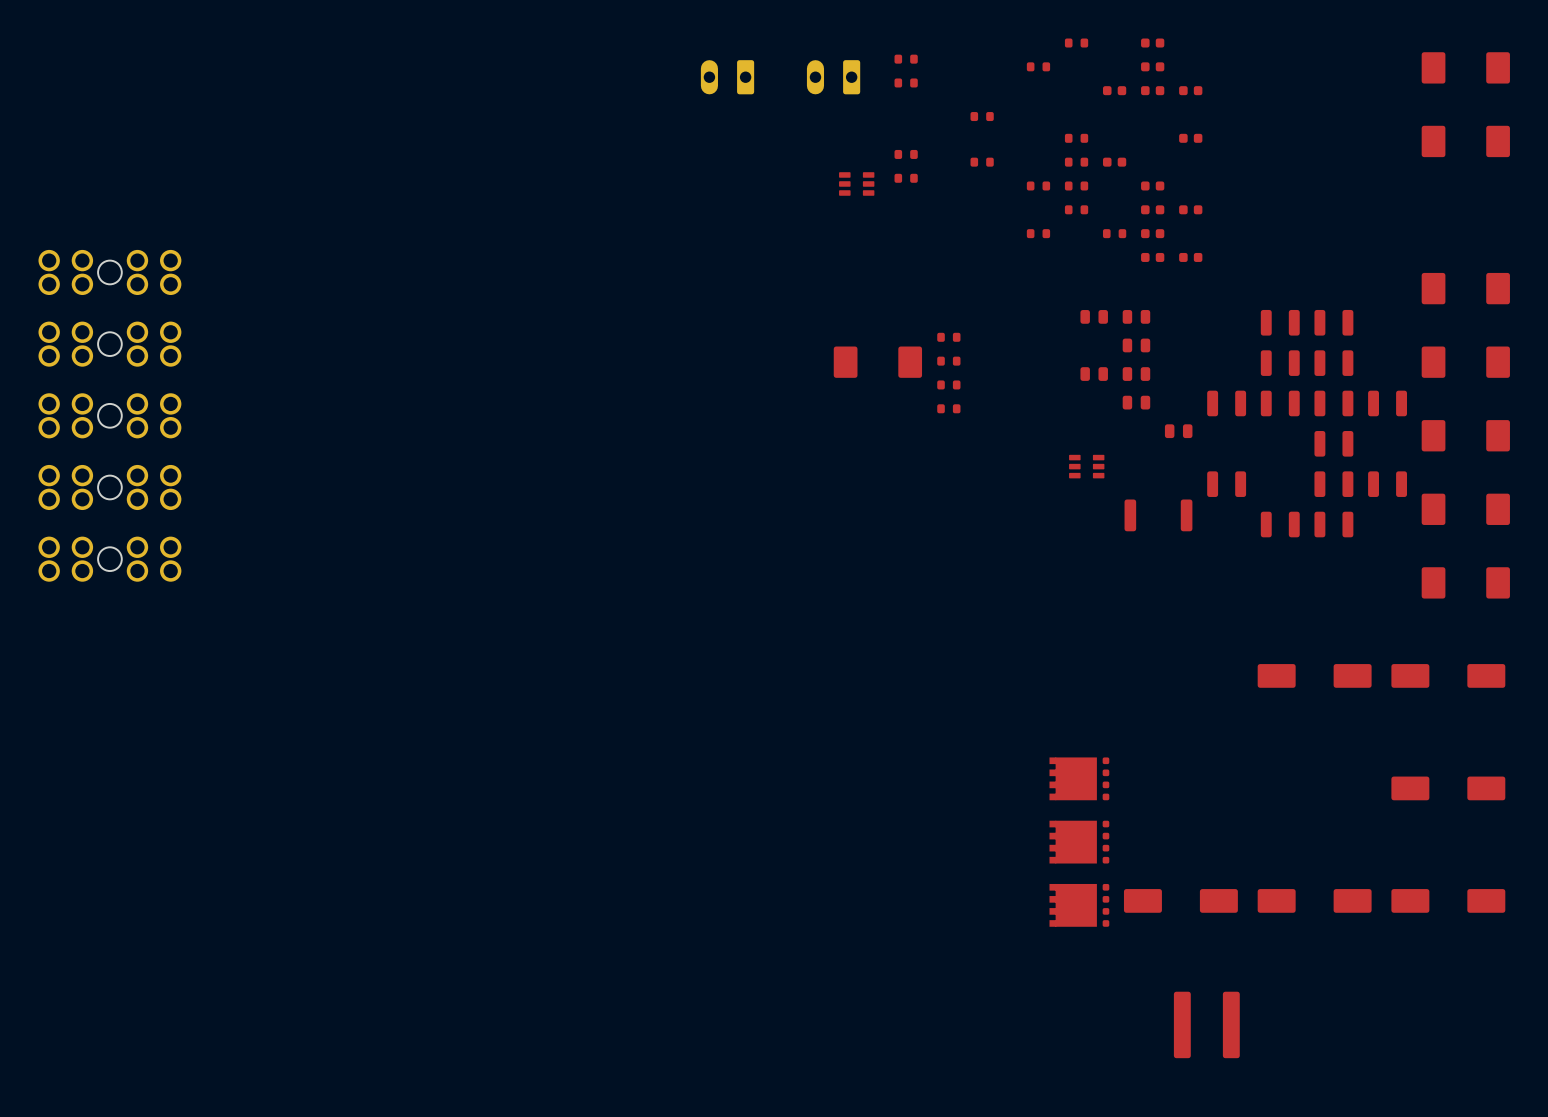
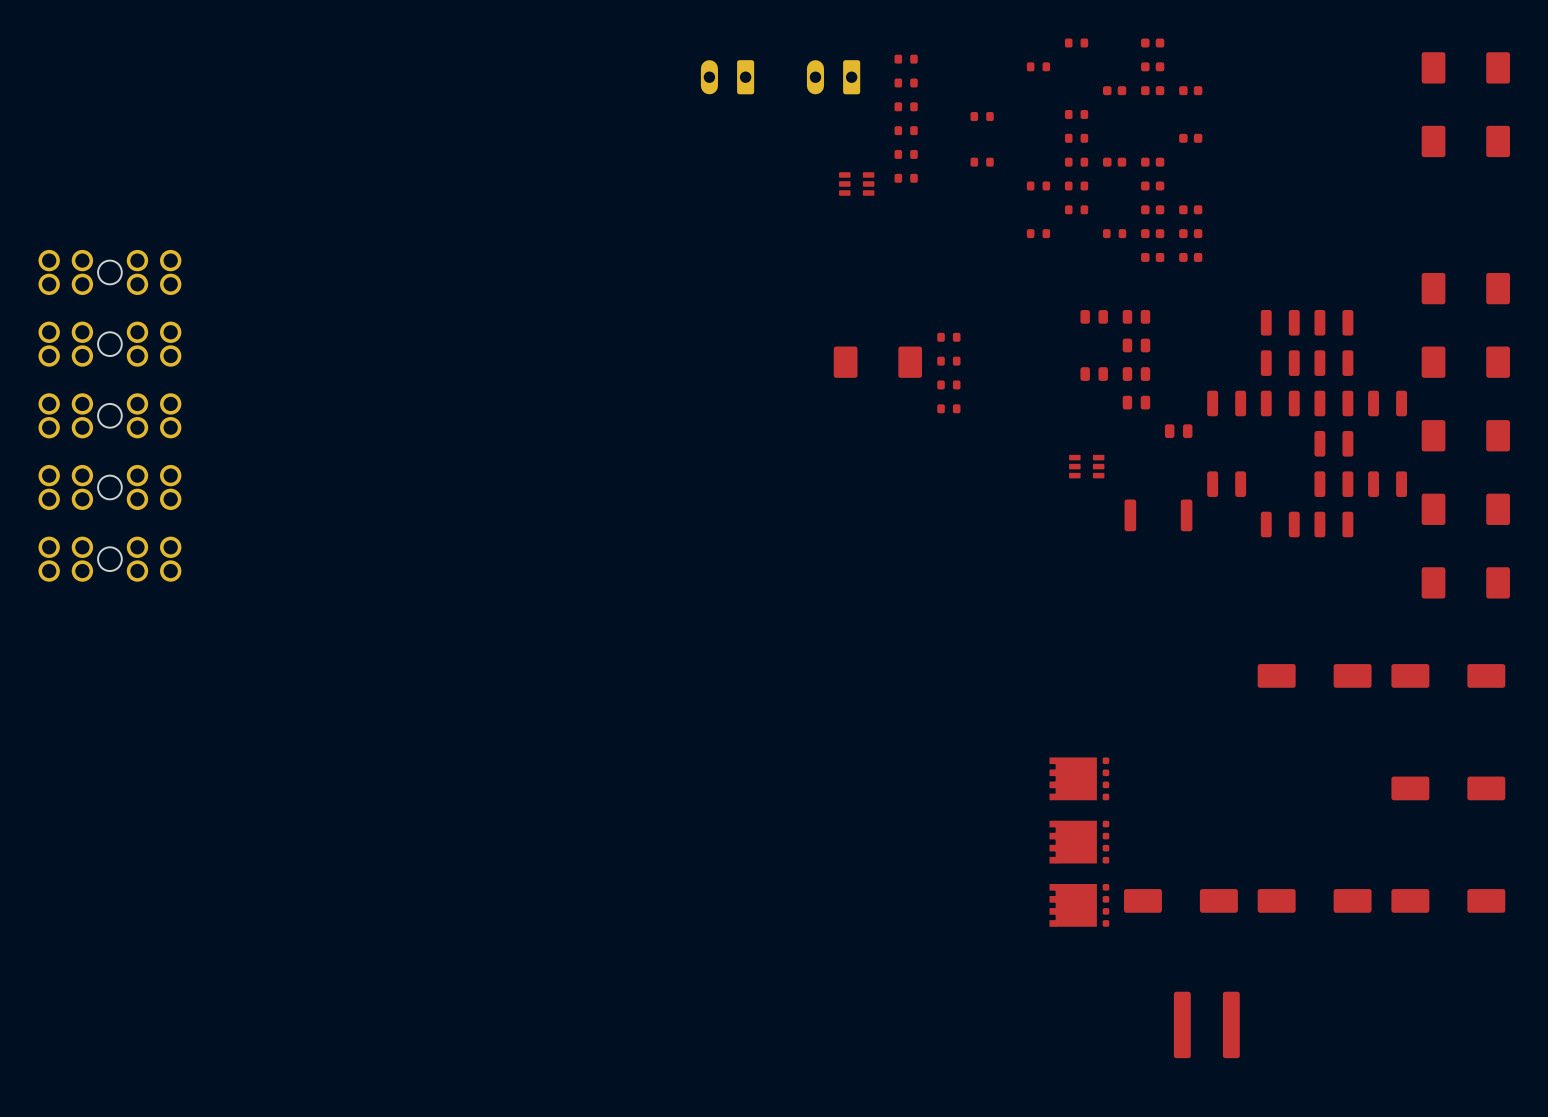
part: none -> (906, 106)
part: none -> (1076, 114)
part: none -> (906, 130)
part: none -> (1152, 162)
part: none -> (1190, 233)

